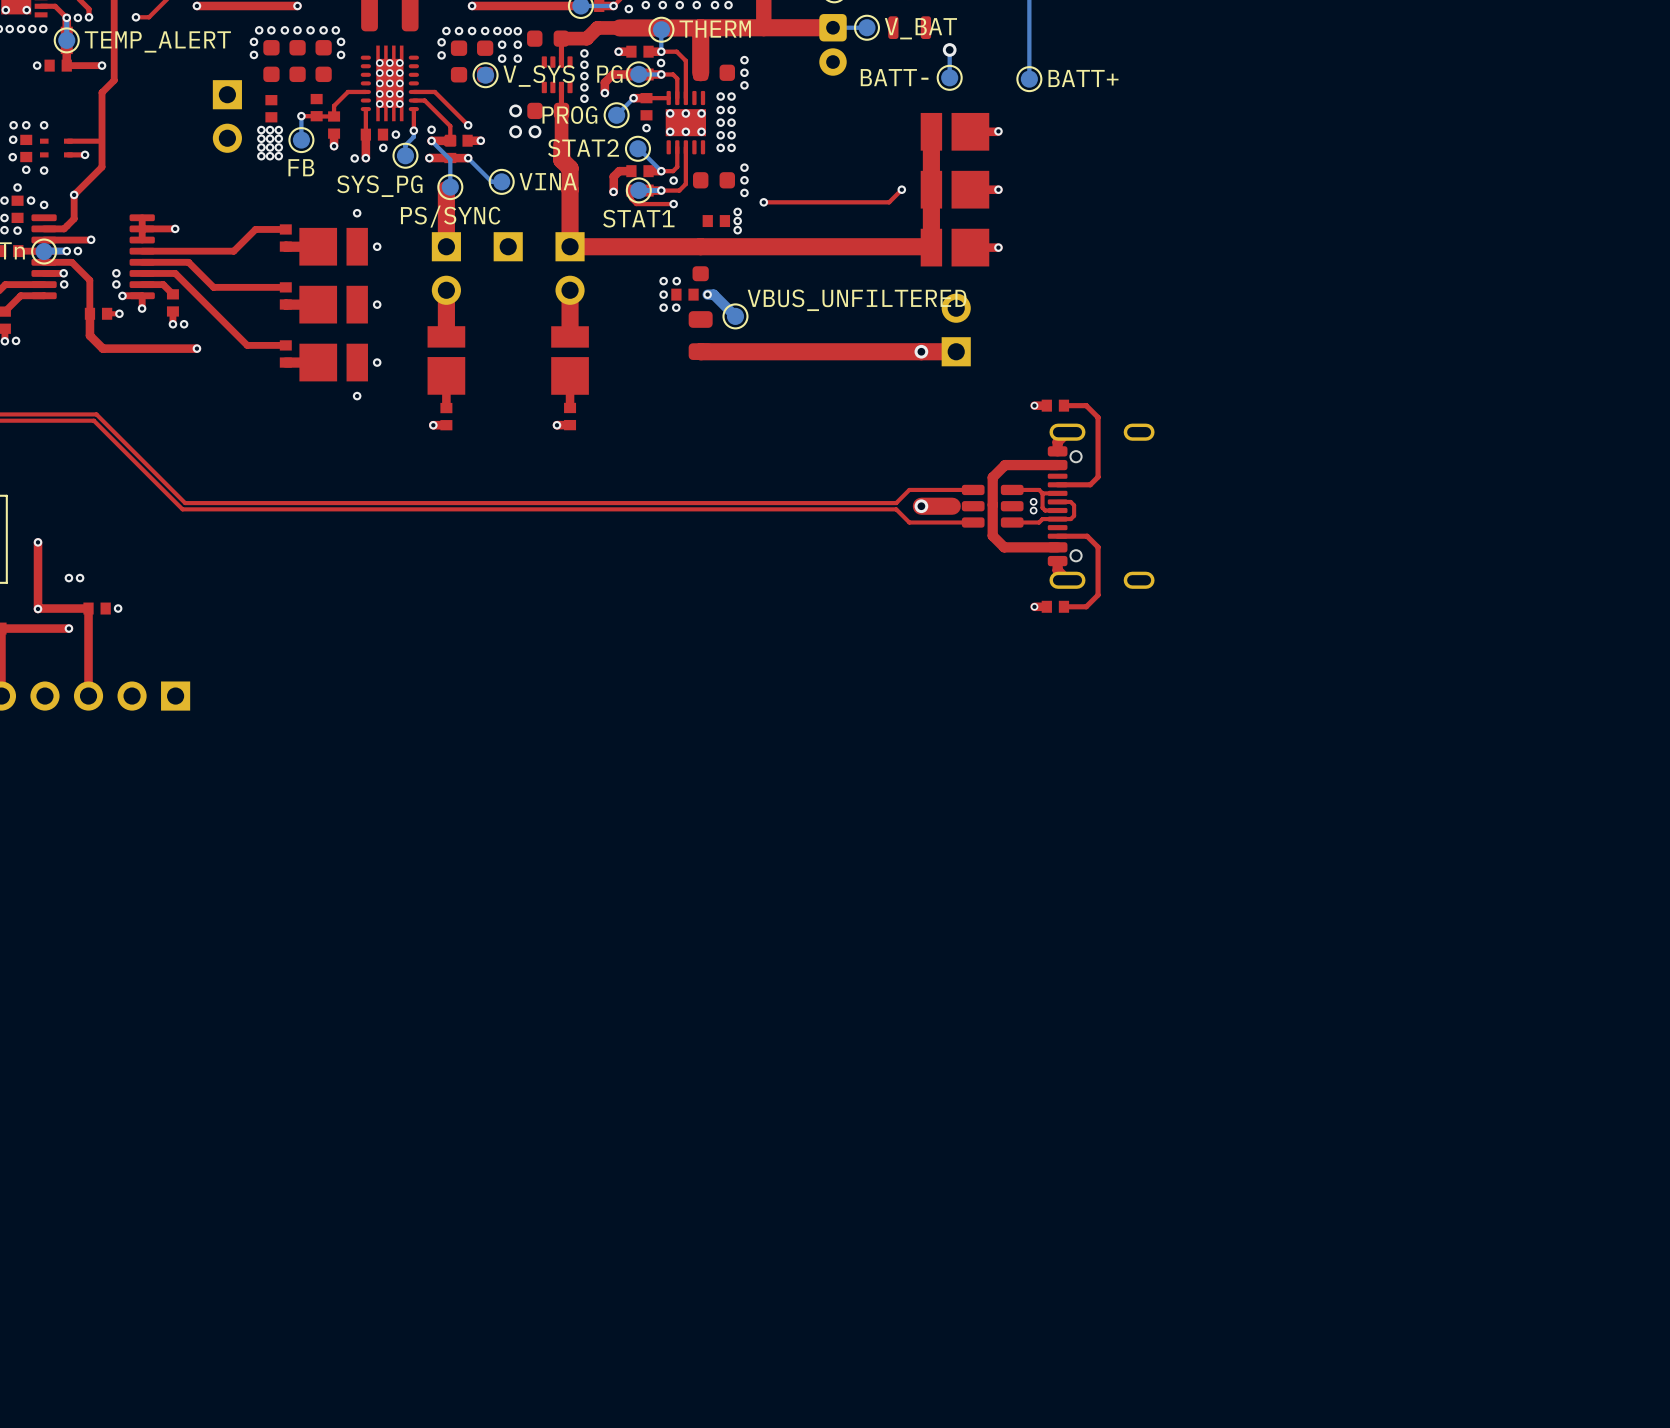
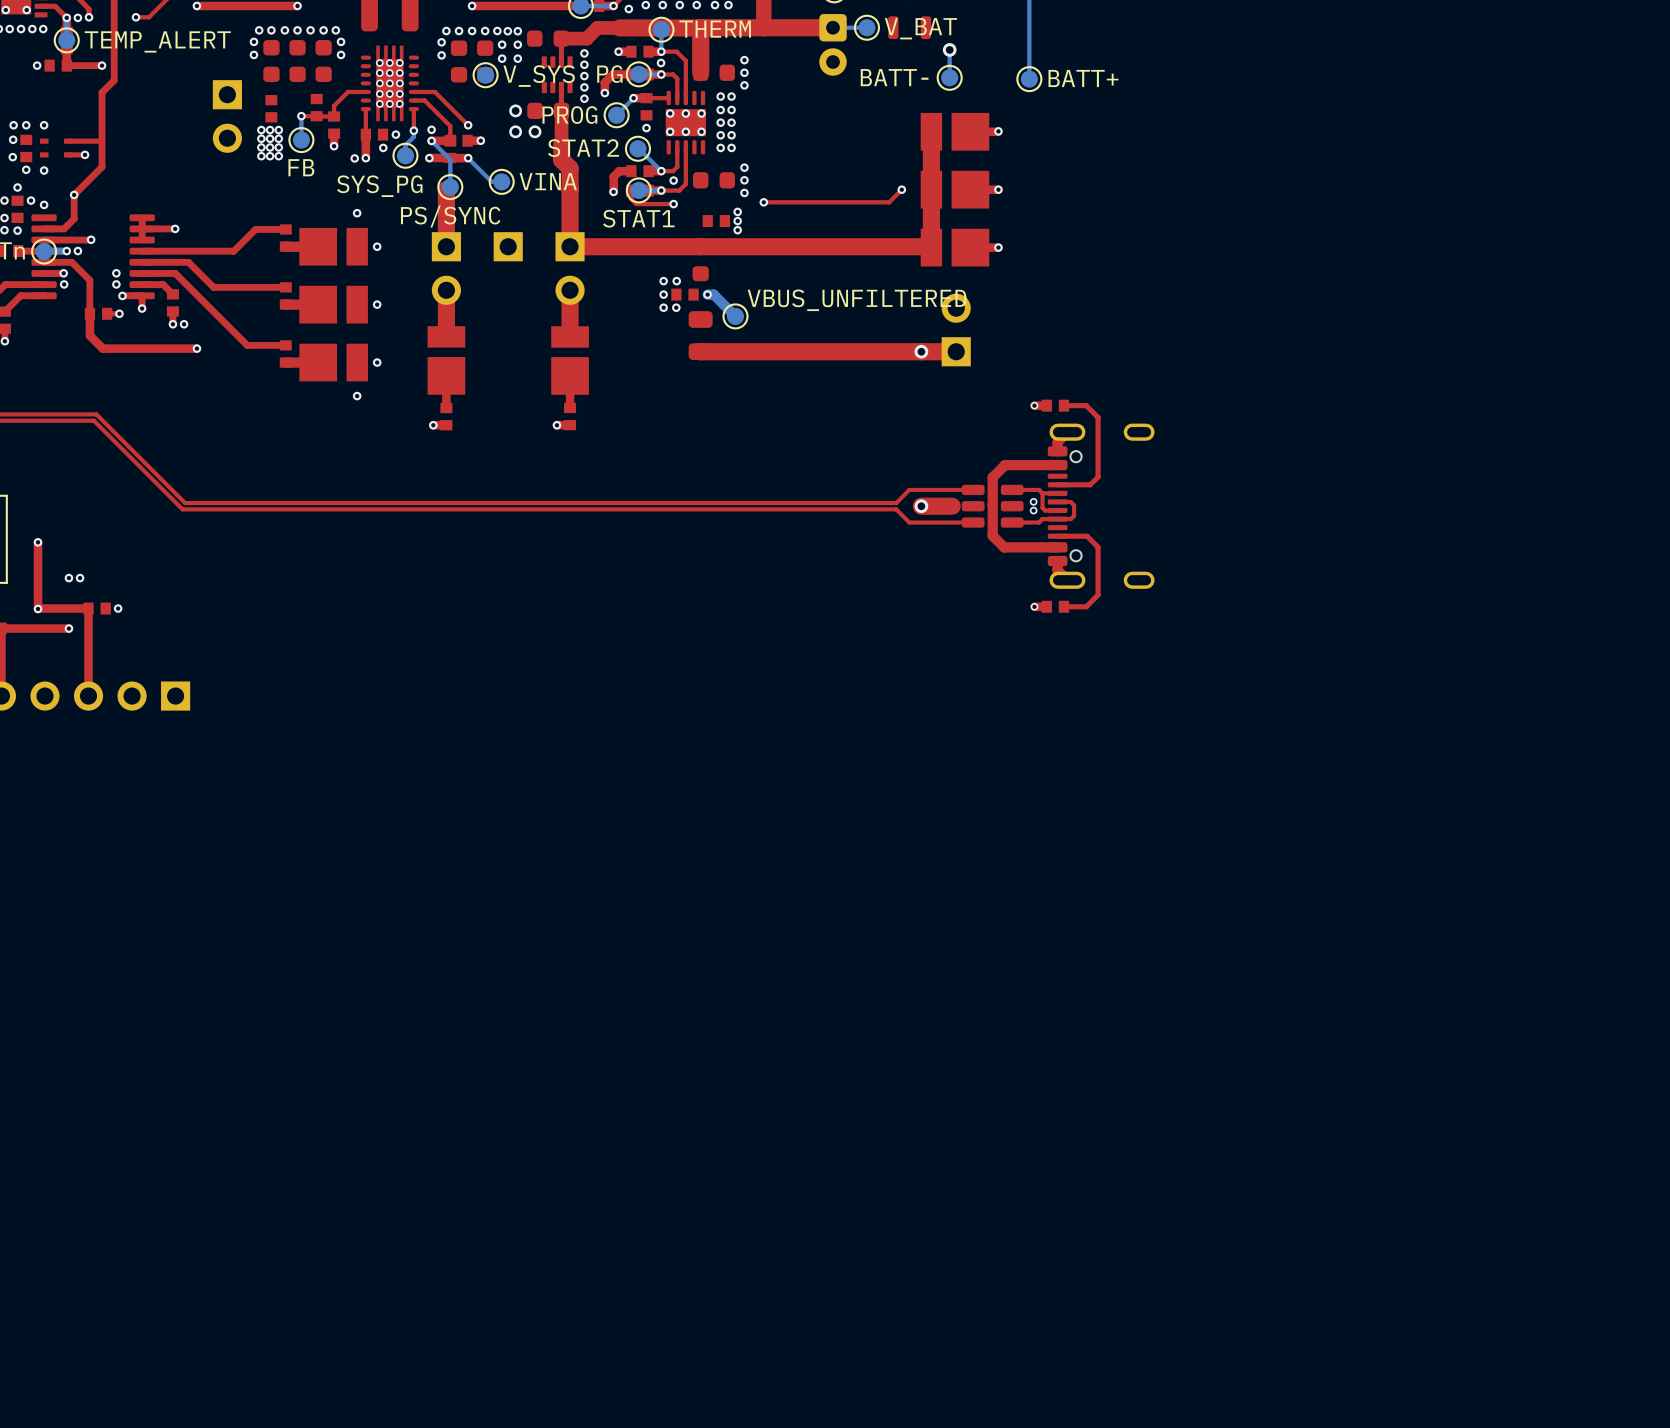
via: (16, 340) -> none

